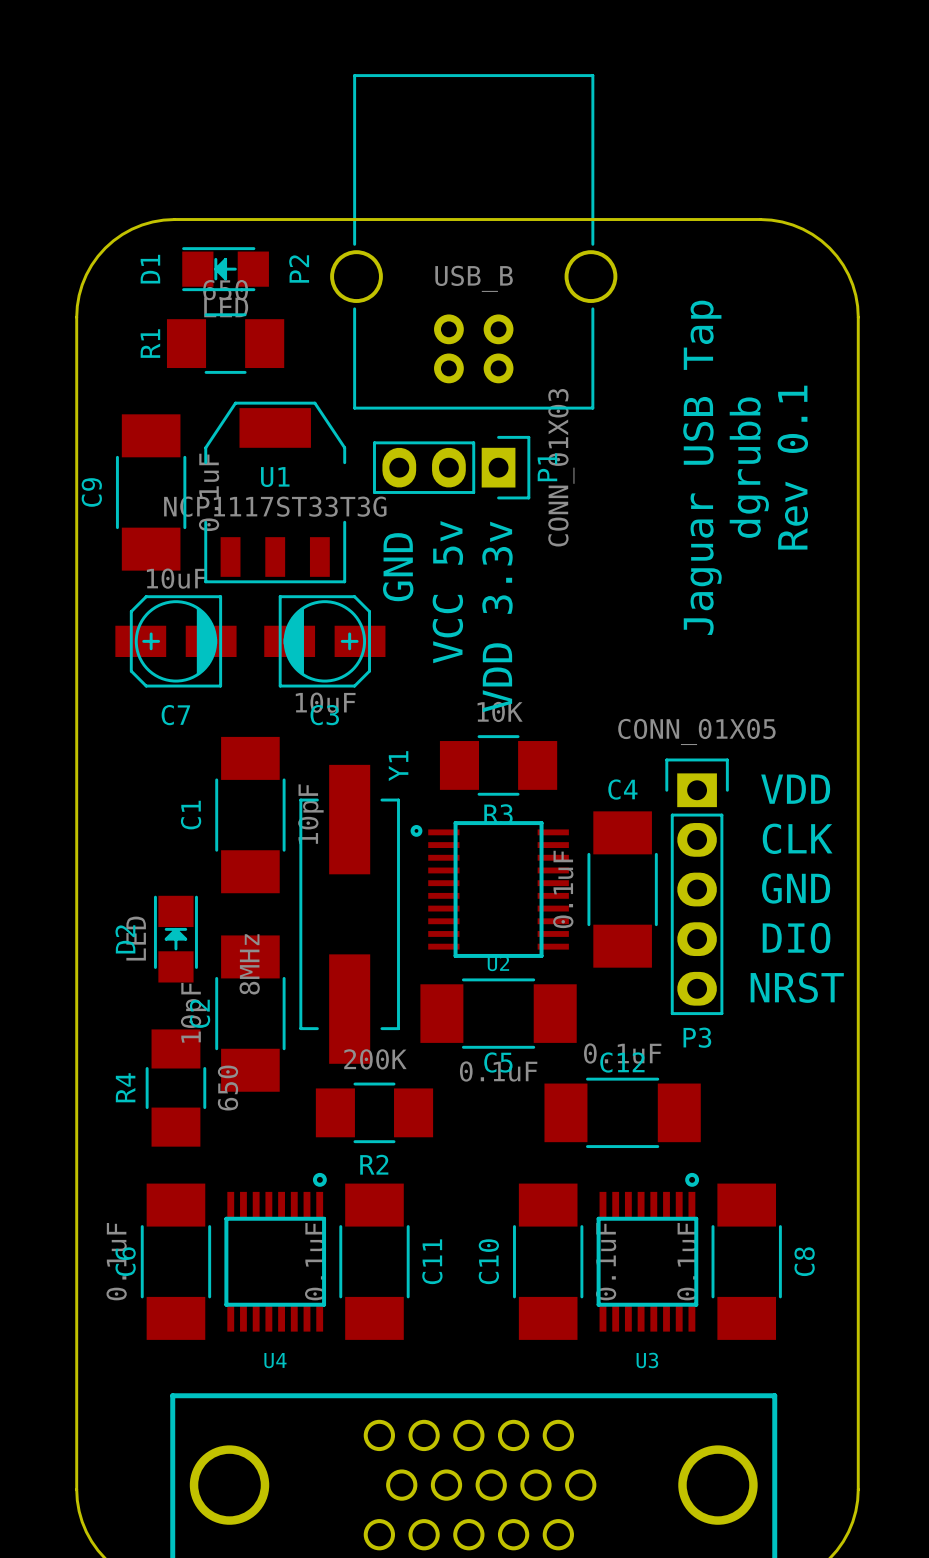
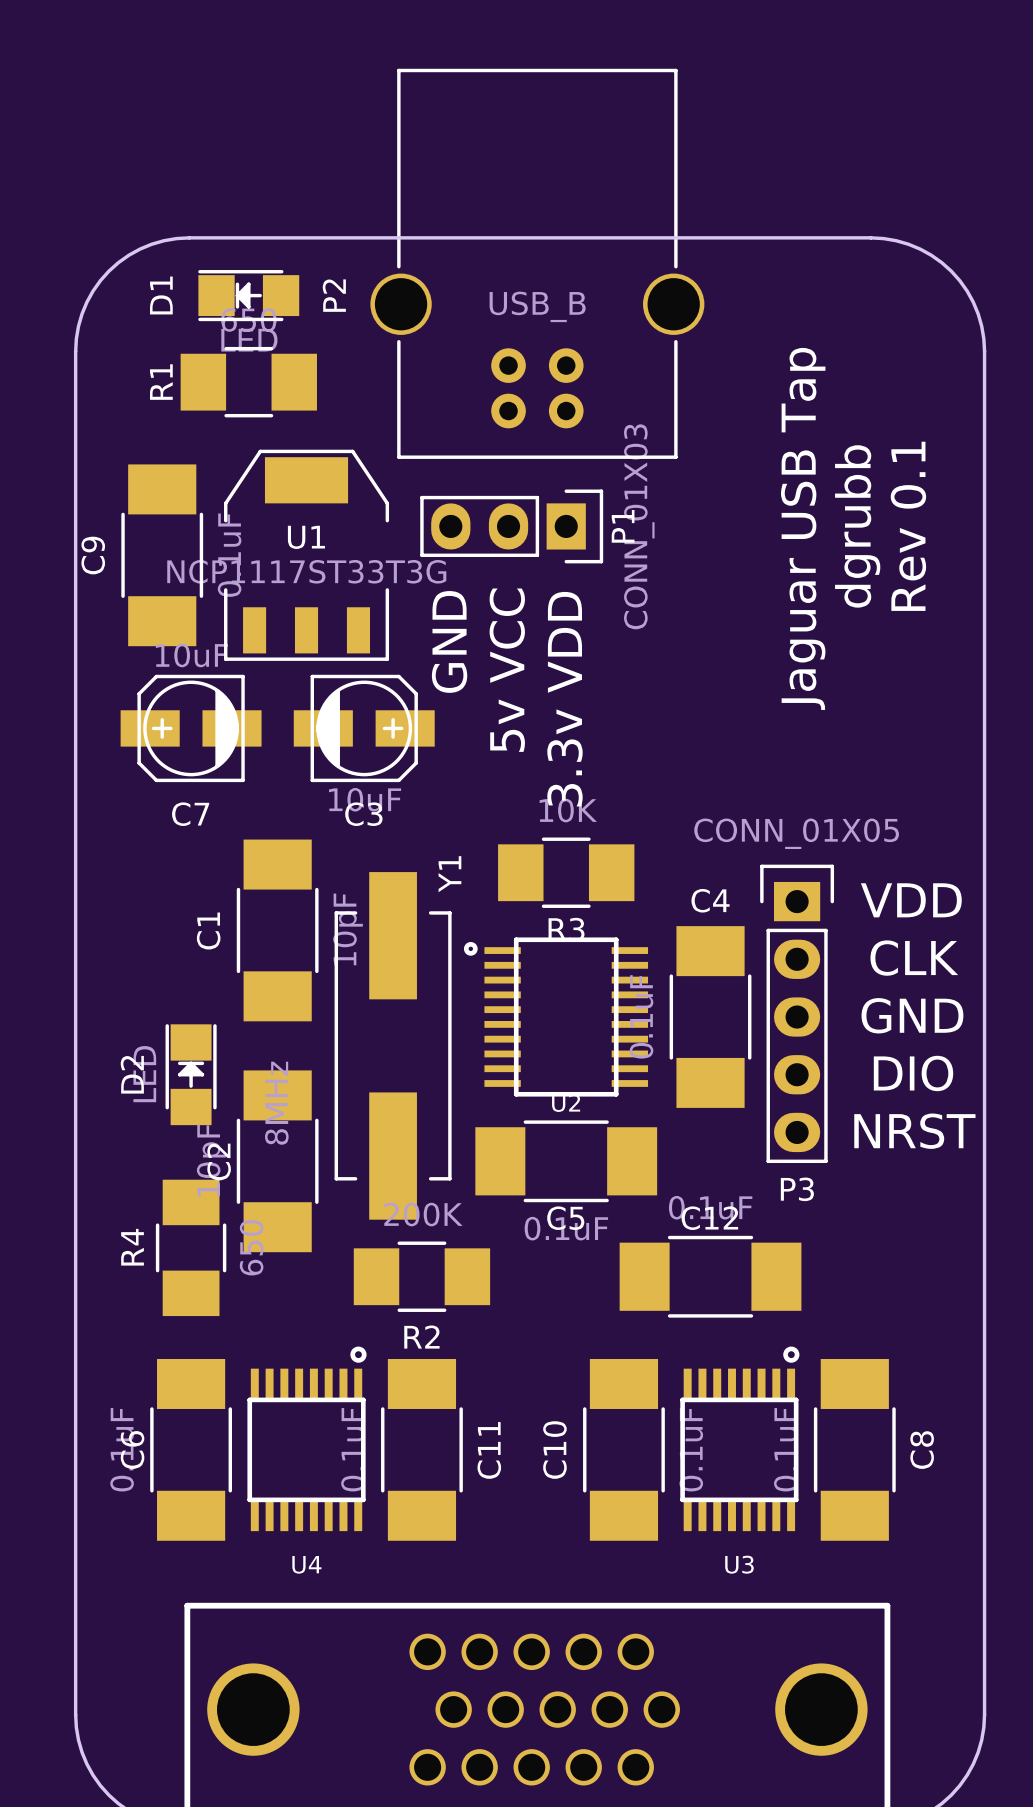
text: VCC 5v (447, 592) -> 5v VCC (507, 670)
text: VDD 3.3v (497, 616) -> 3.3v VDD (564, 699)

